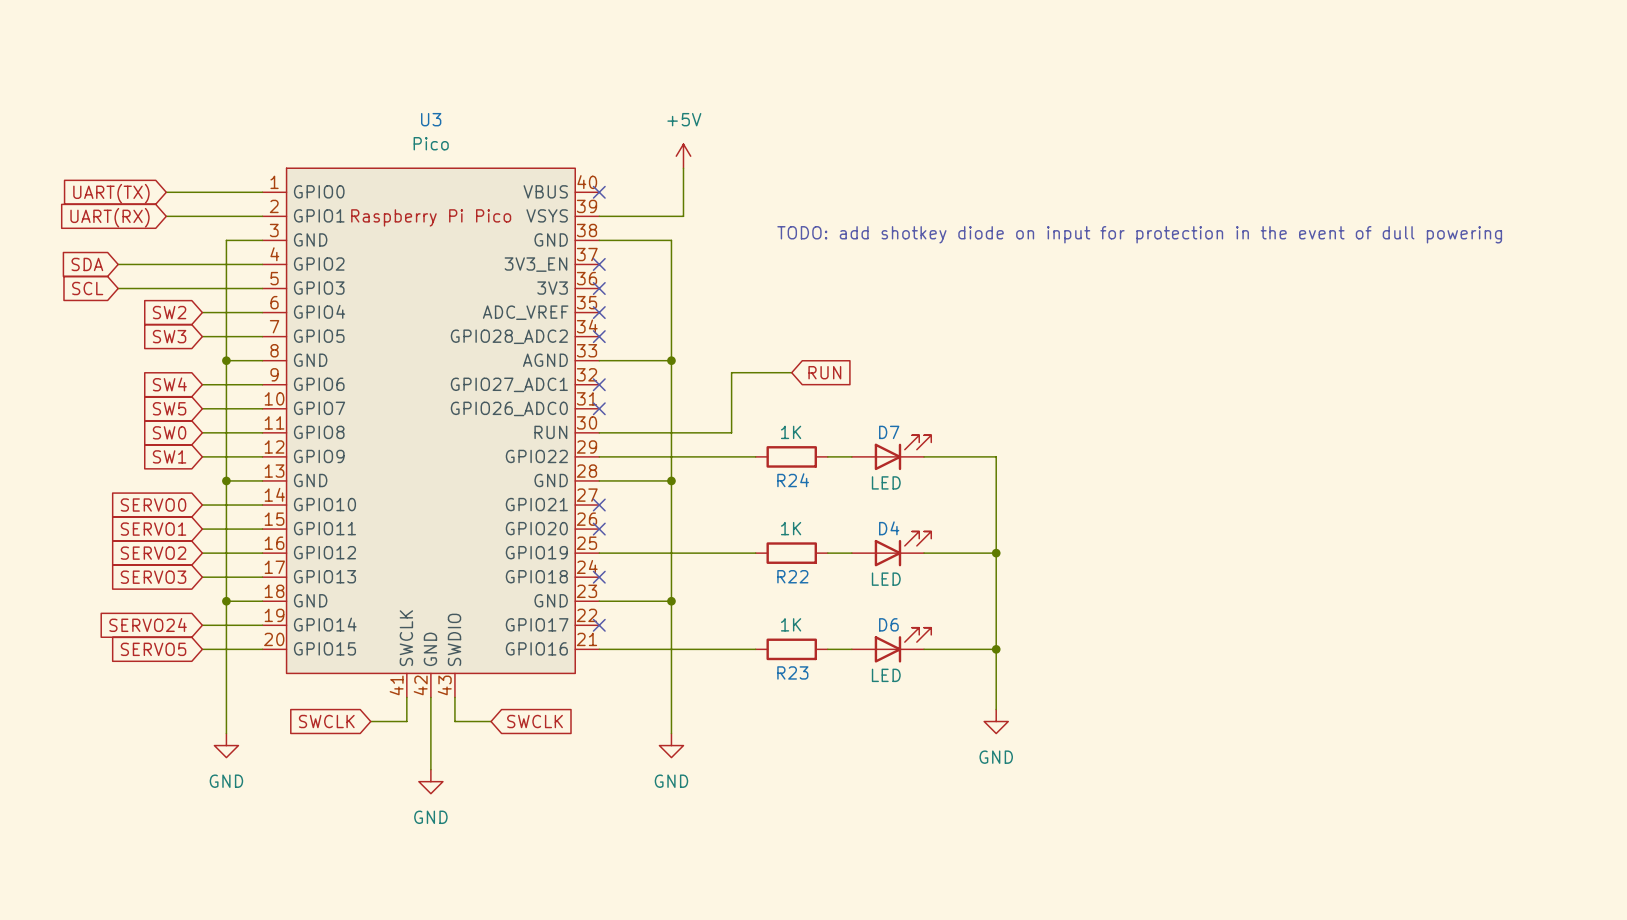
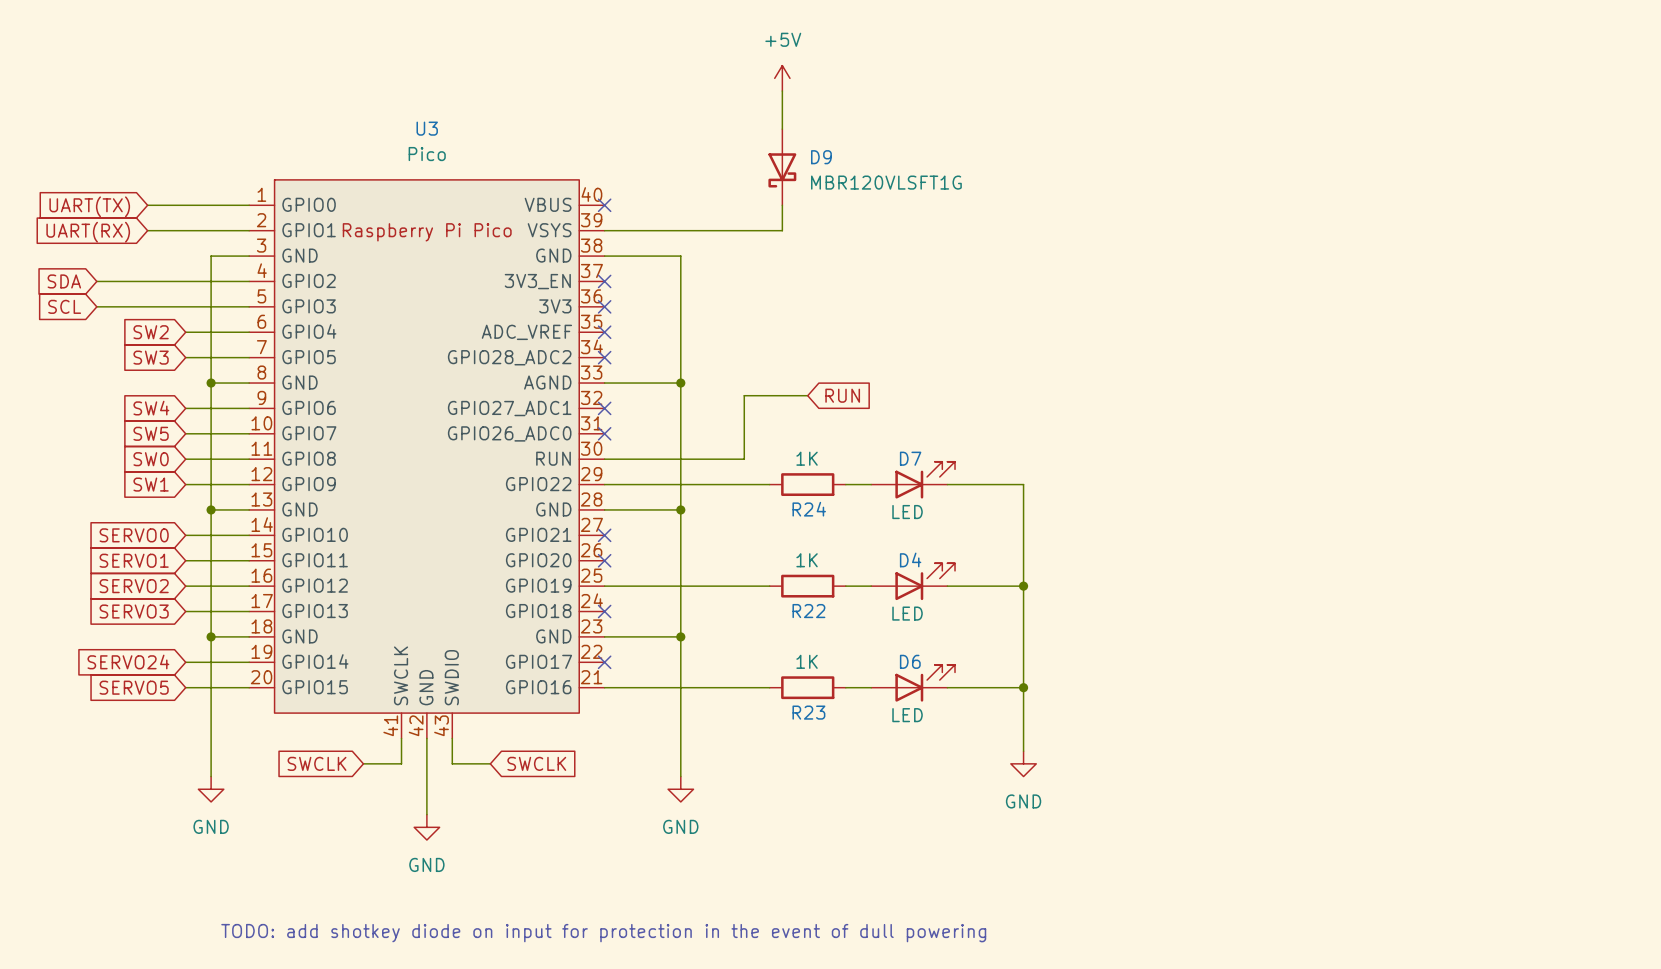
wire: none -> (782, 91) (782, 129)
power symbol position: +5V (683, 156) -> +5V (782, 78)
D9: none -> MBR120VLSFT1G (782, 167)
wire: (683, 168) (683, 216) -> (782, 205) (782, 230) (693, 230)
text: TODO: add shotkey diode on input for protection in the event of dull powering (1139, 234) -> none
text: none -> TODO: add shotkey diode on input for protection in the event of dull powering (603, 933)

